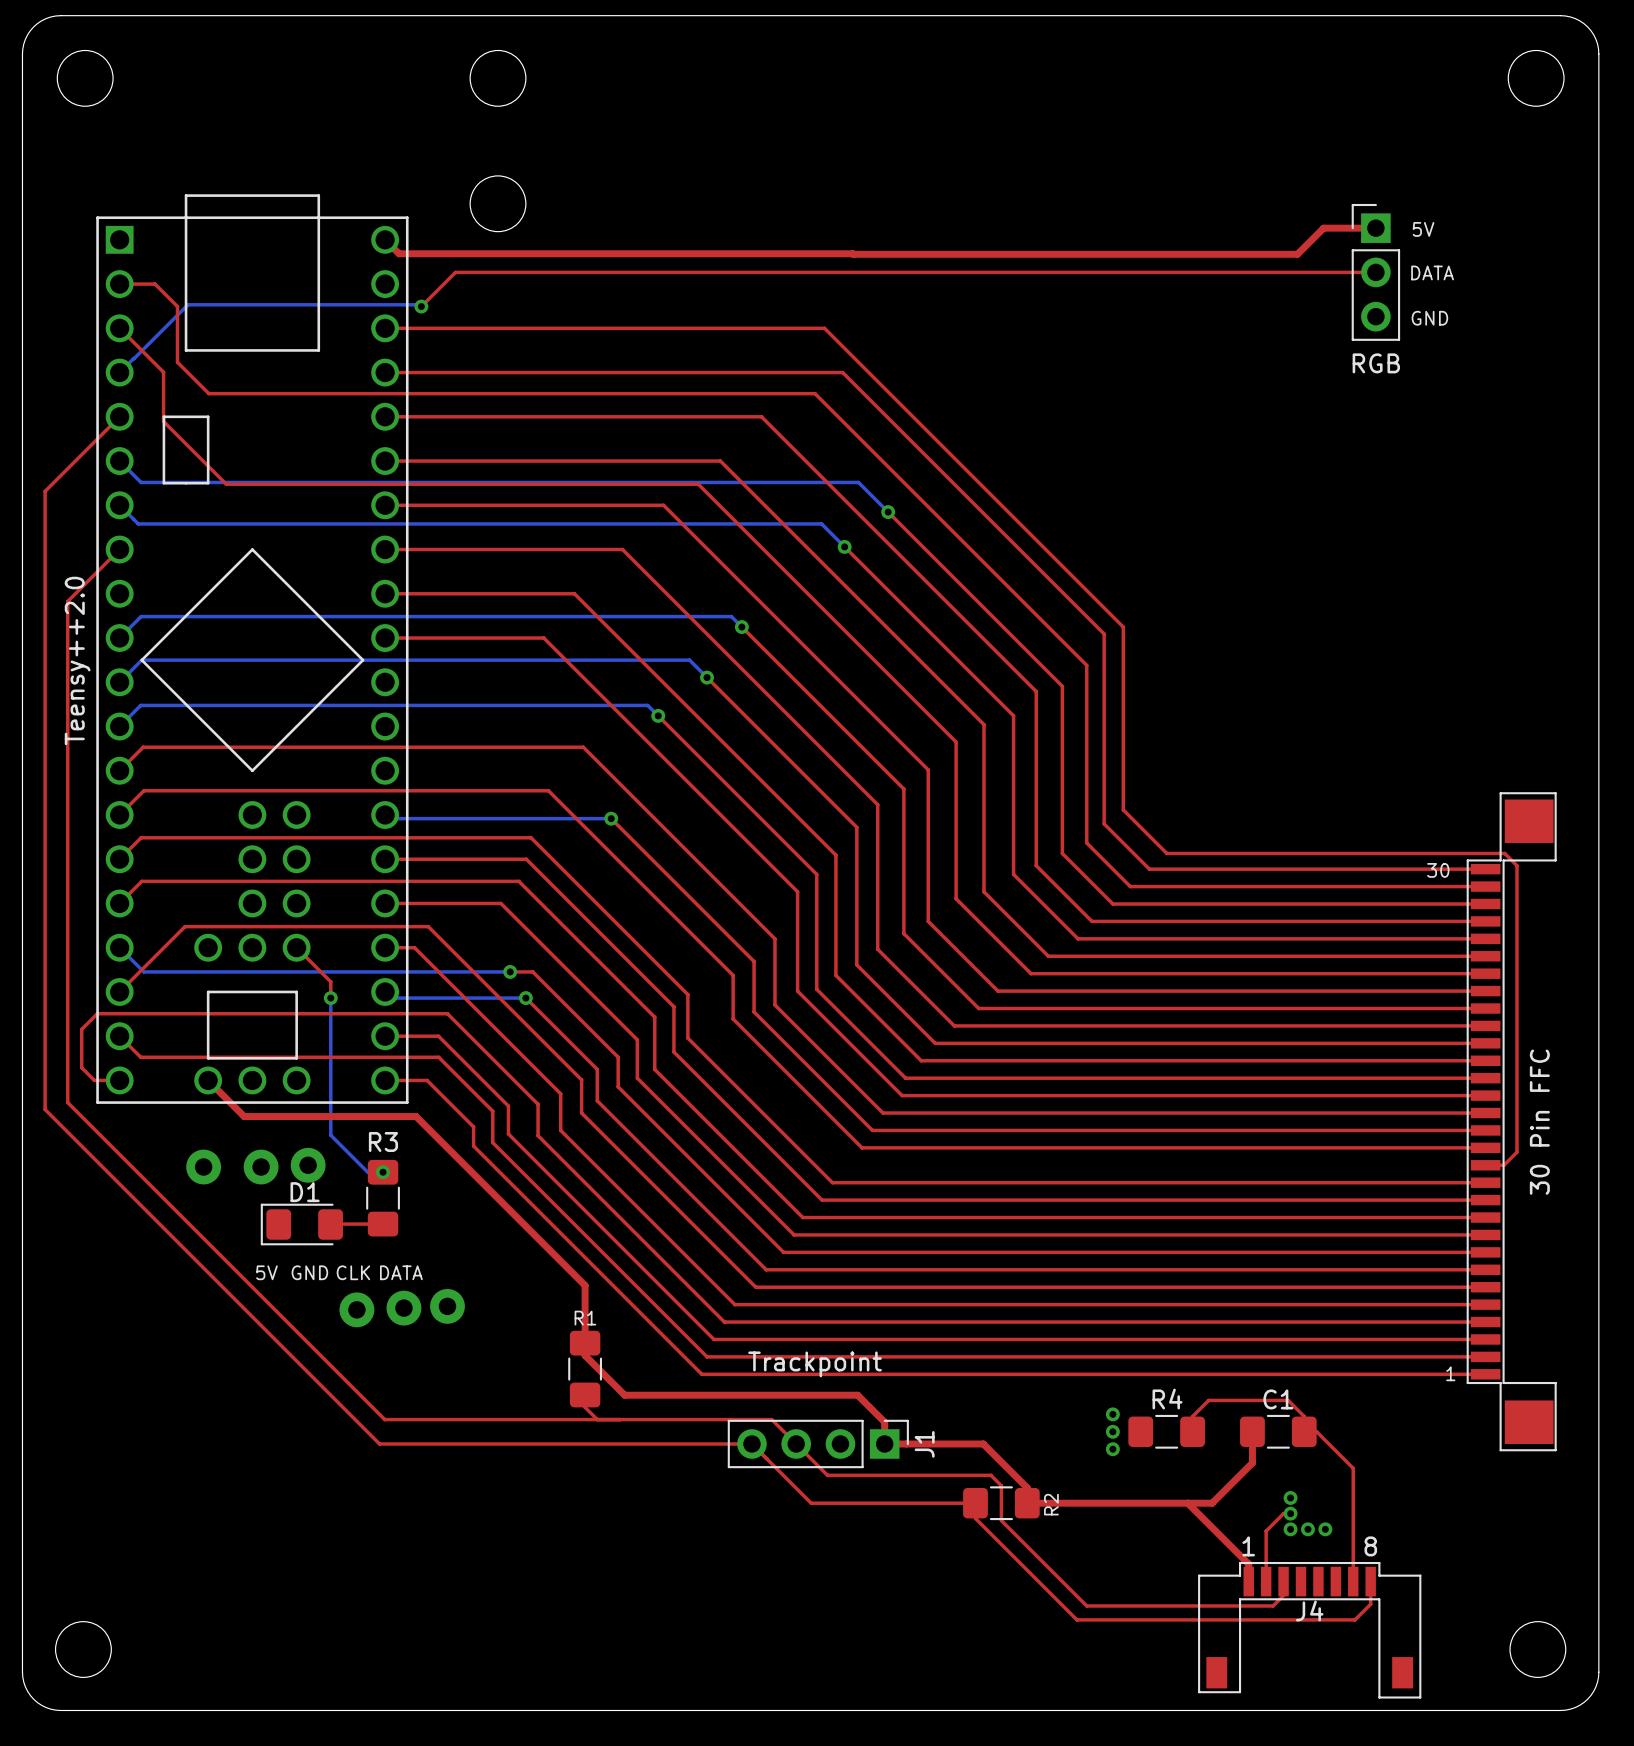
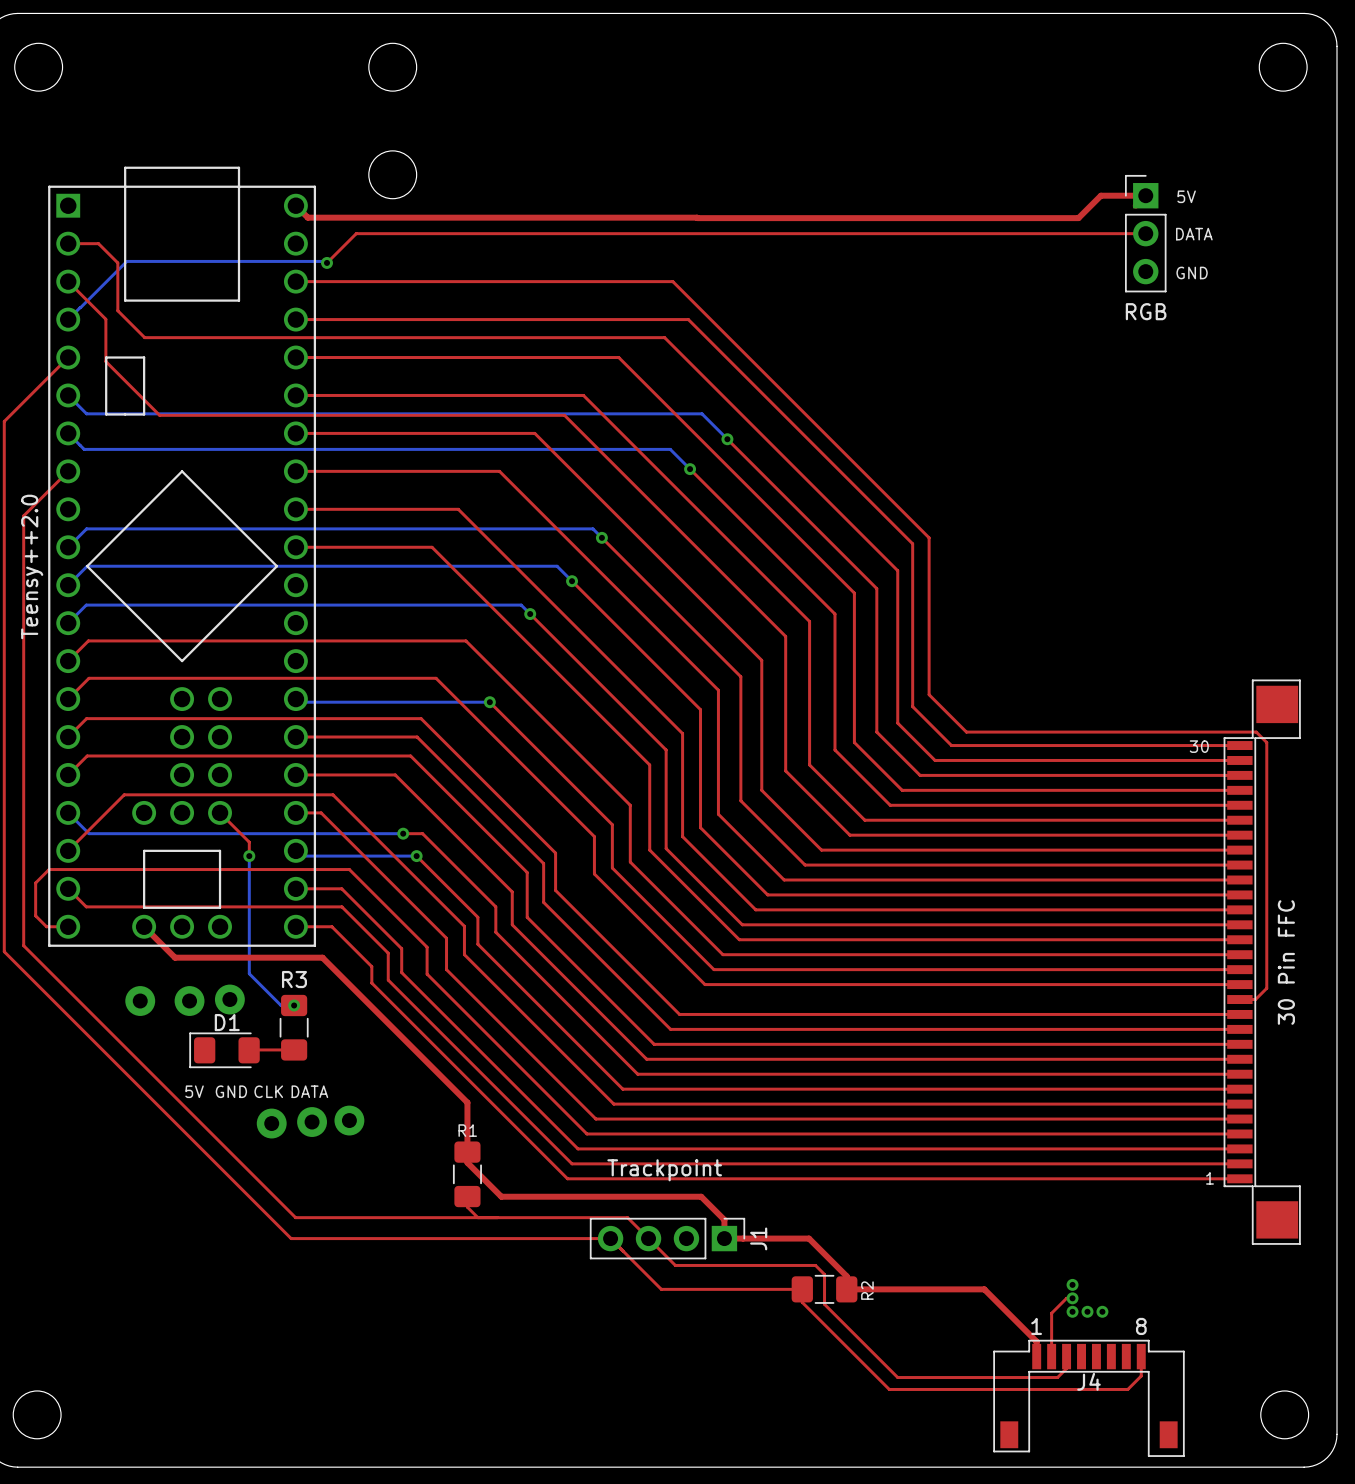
via: (1112, 1414) -> none
via: (1112, 1431) -> none
R4: (1166, 1431) -> none
top track: (1192, 1431) (1192, 1416) (1208, 1400) (1288, 1400) (1304, 1416) (1304, 1431) (1316, 1431) (1353, 1468) (1353, 1581) -> none
top track: (1252, 1431) (1252, 1462) (1212, 1503) (1187, 1503) -> none
C1: (1278, 1431) -> none
via: (1112, 1449) -> none

